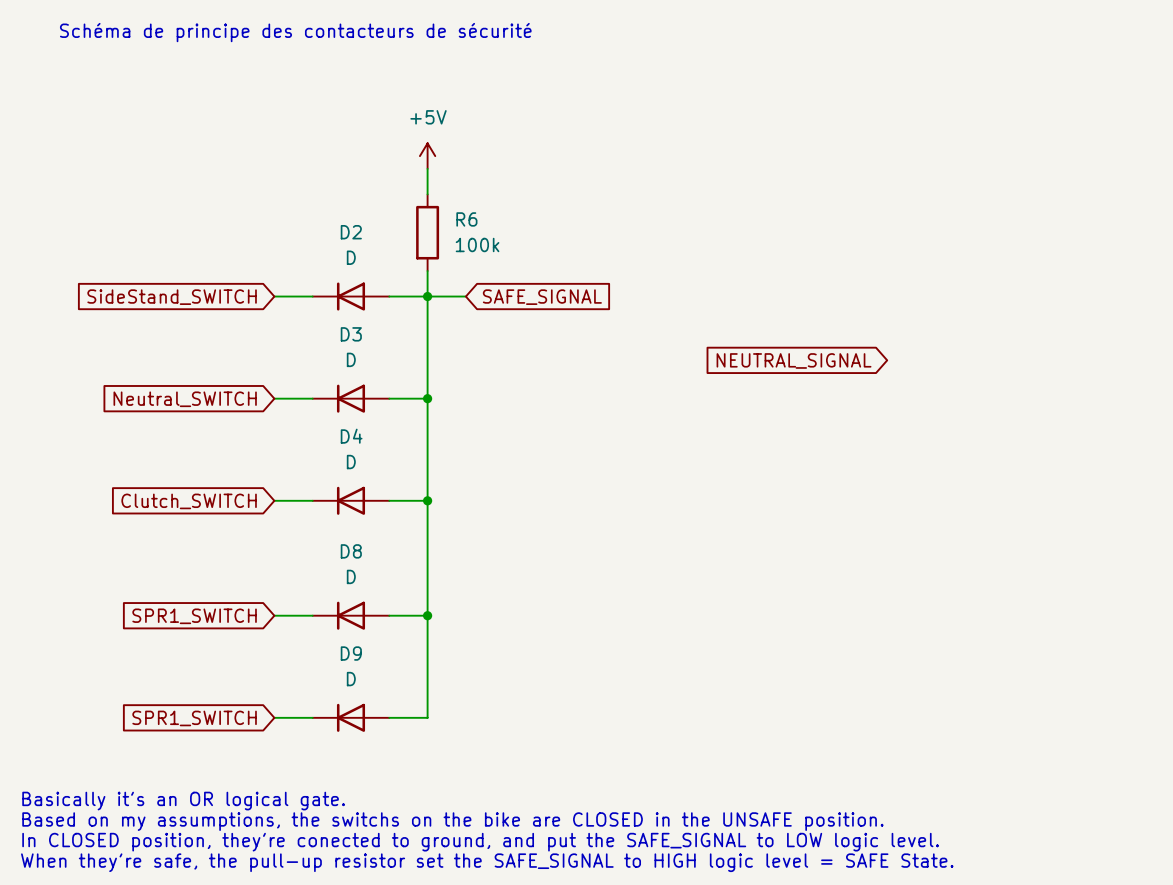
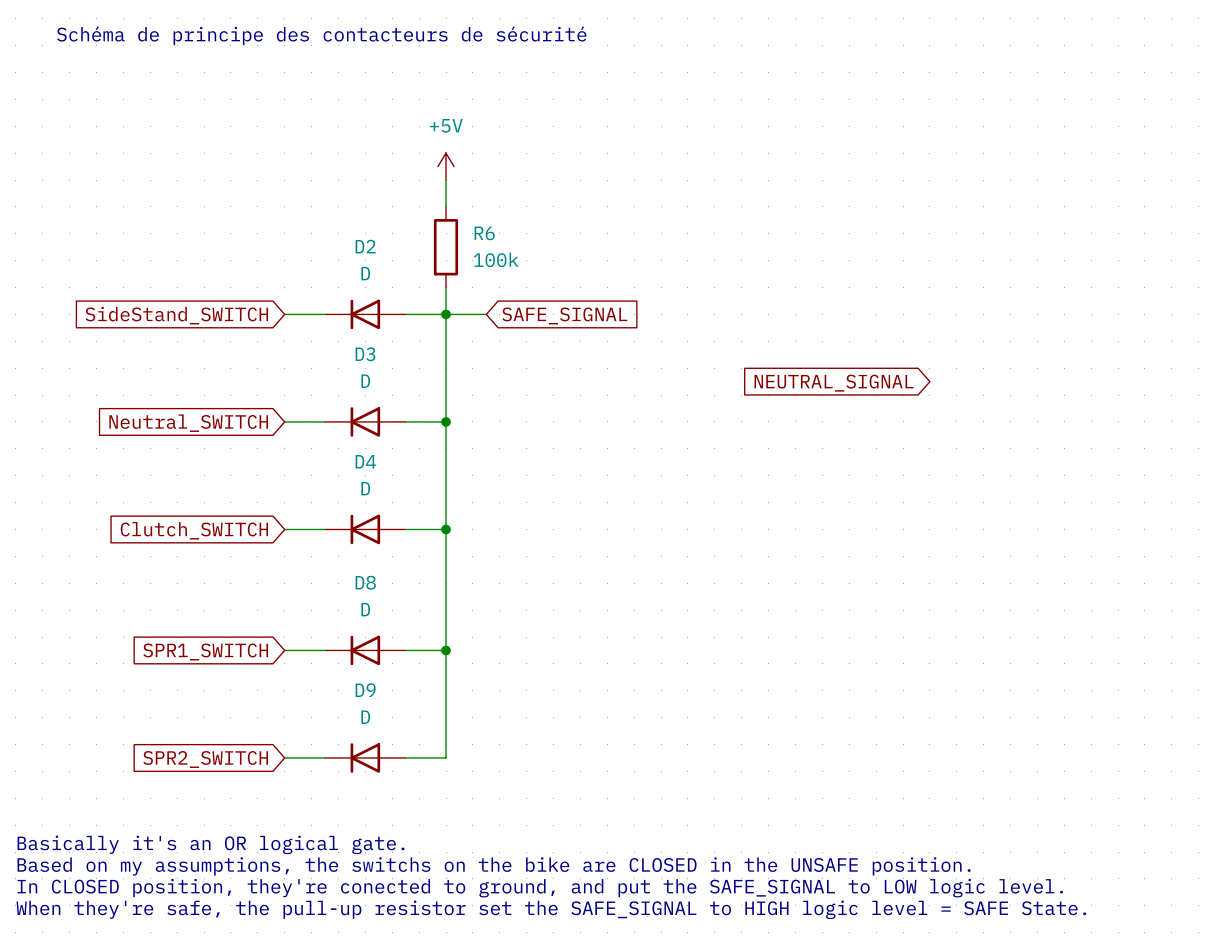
global label: SPR1_SWITCH (194, 718) -> SPR2_SWITCH (205, 759)

